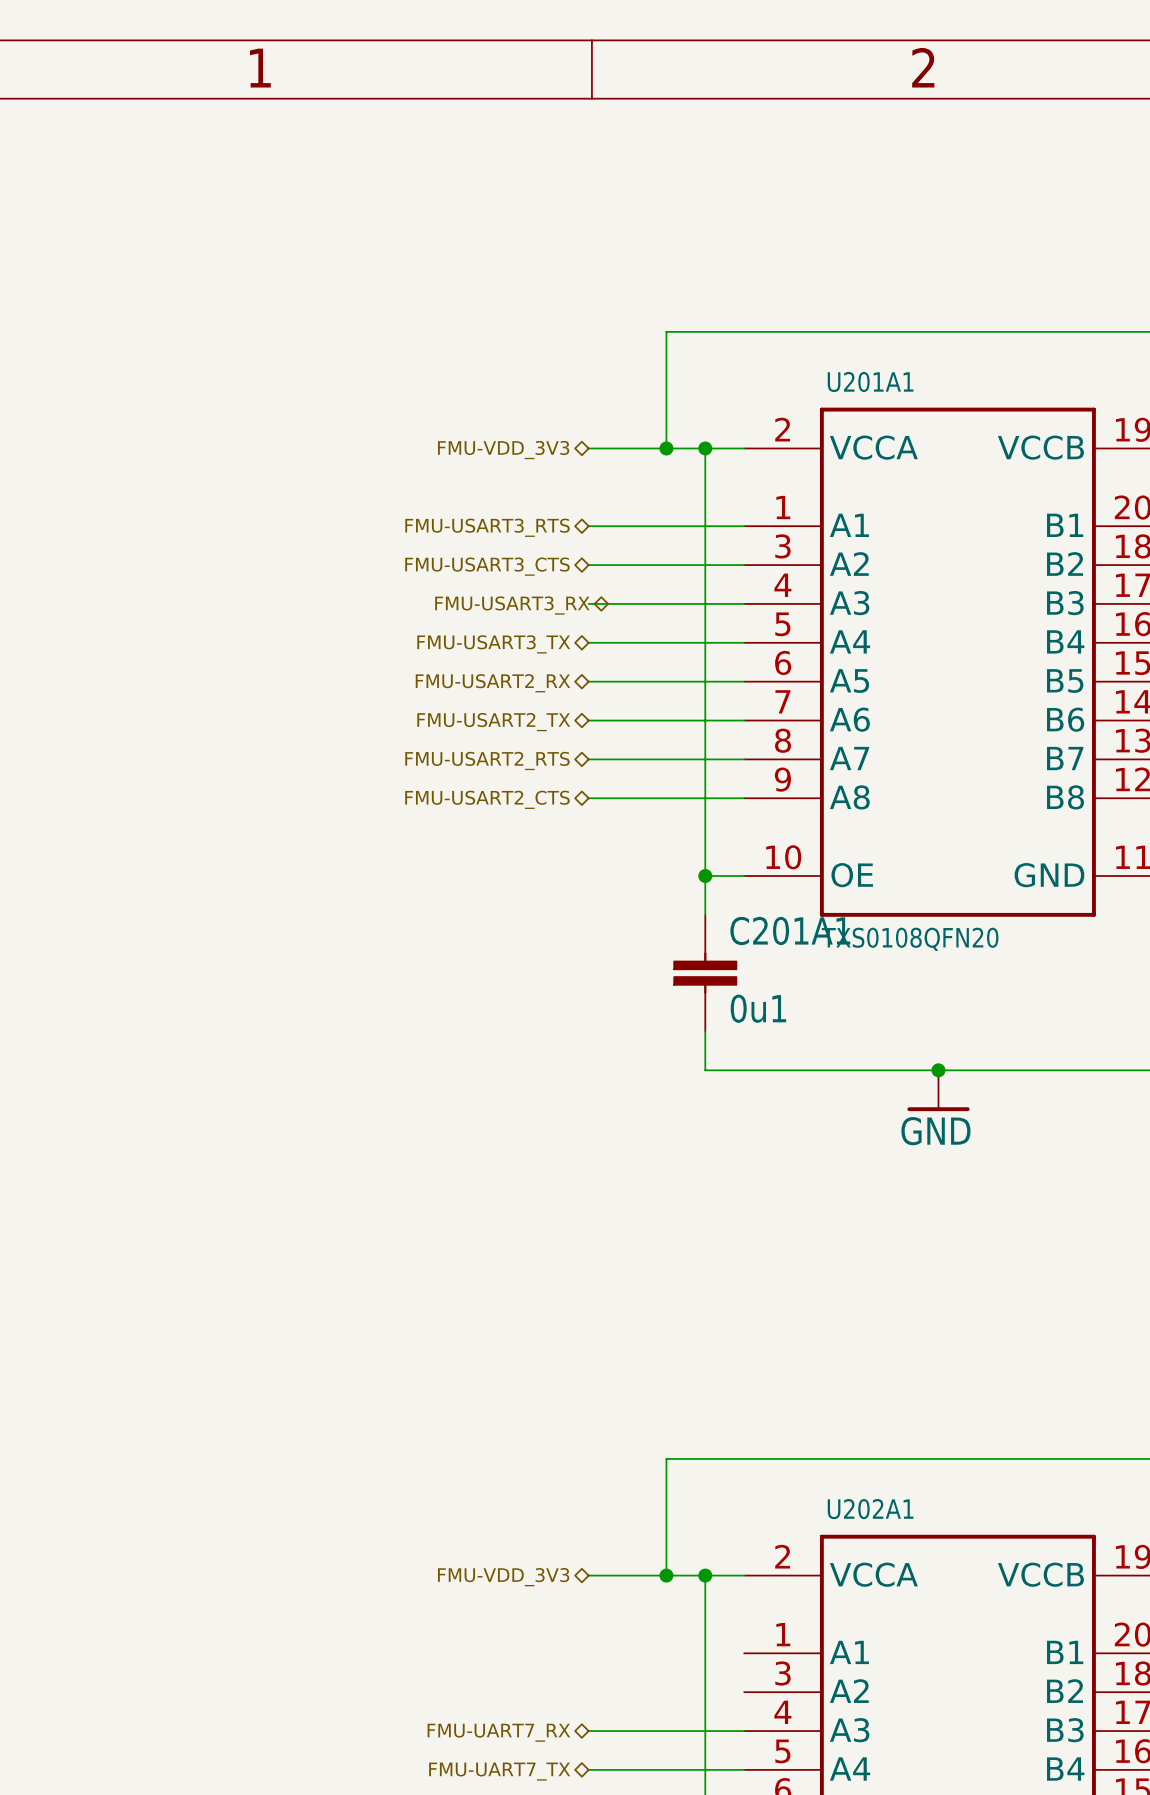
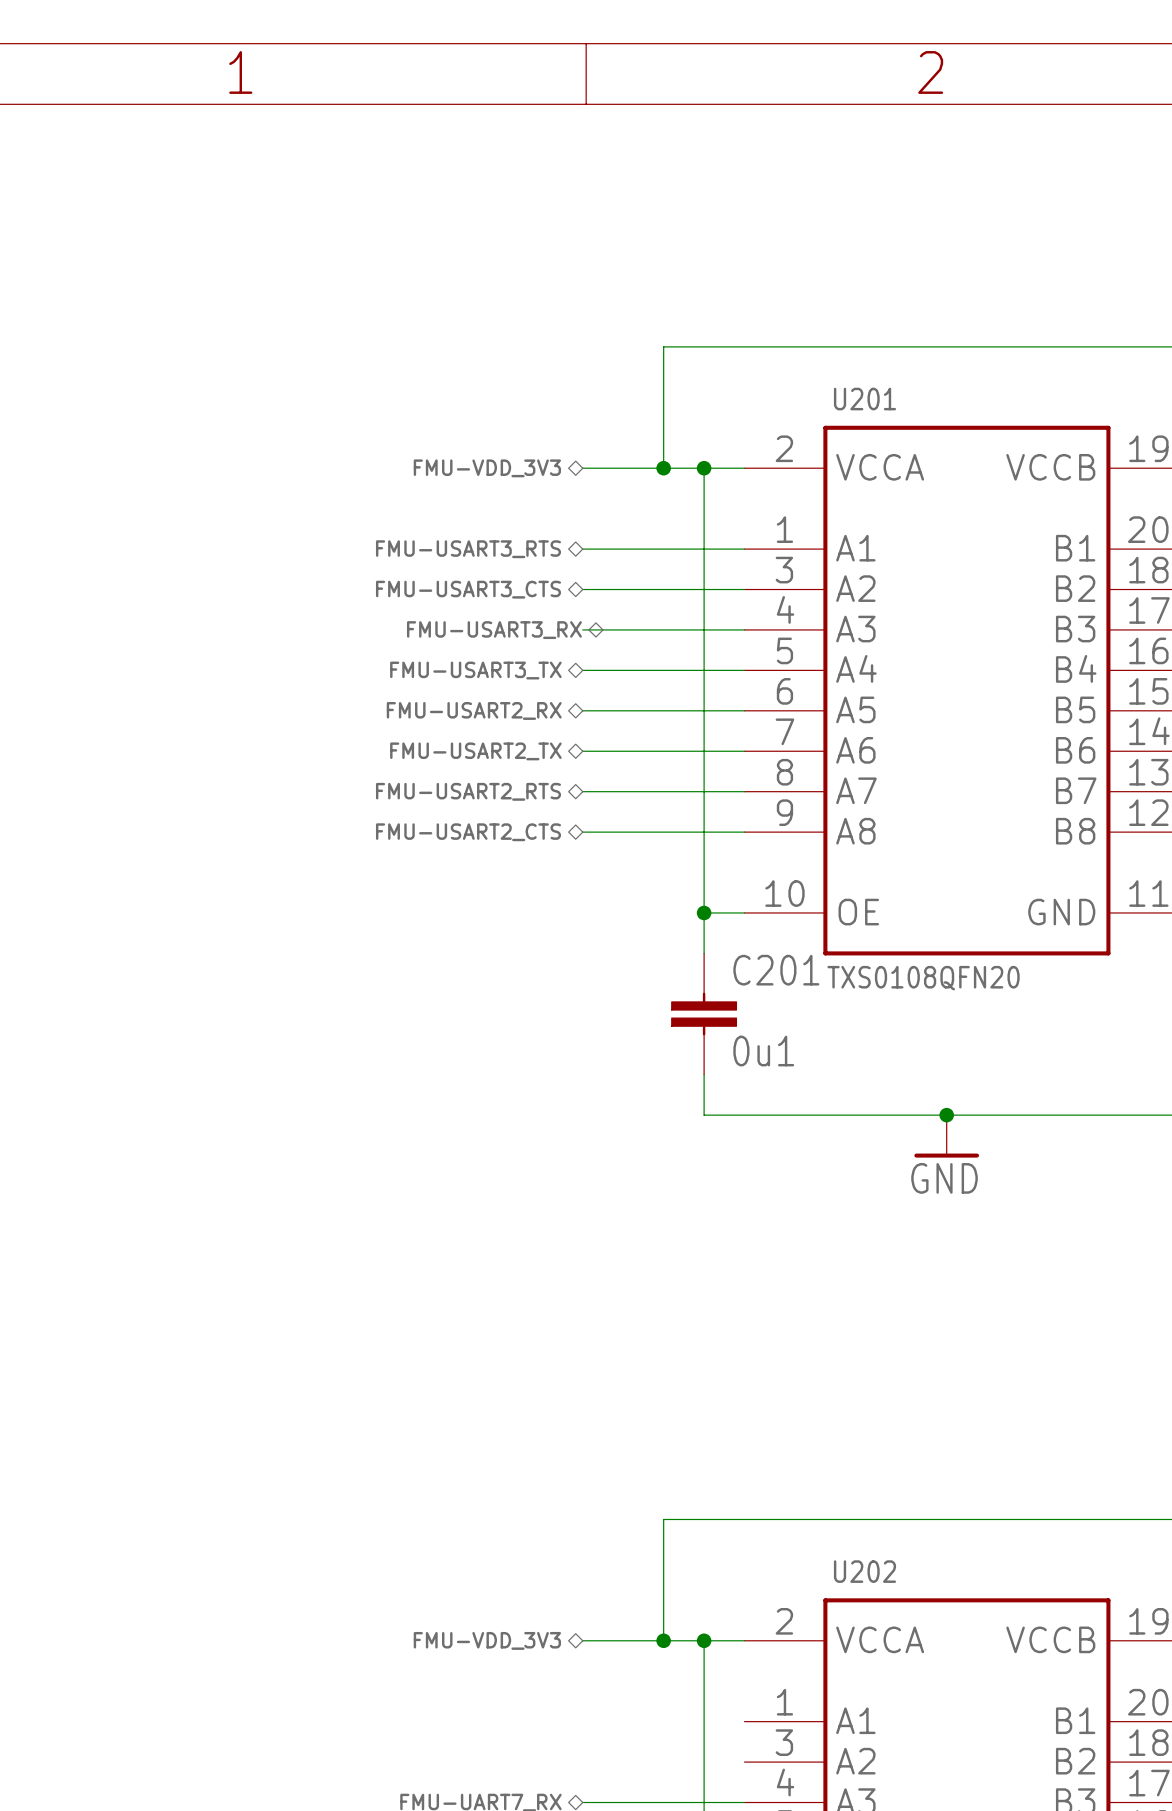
U201A1 name: U201A1 (870, 381) -> U201 (864, 399)
C201A1 name: C201A1 (790, 930) -> C201 (776, 970)
U202A1 name: U202A1 (870, 1509) -> U202 (864, 1571)

